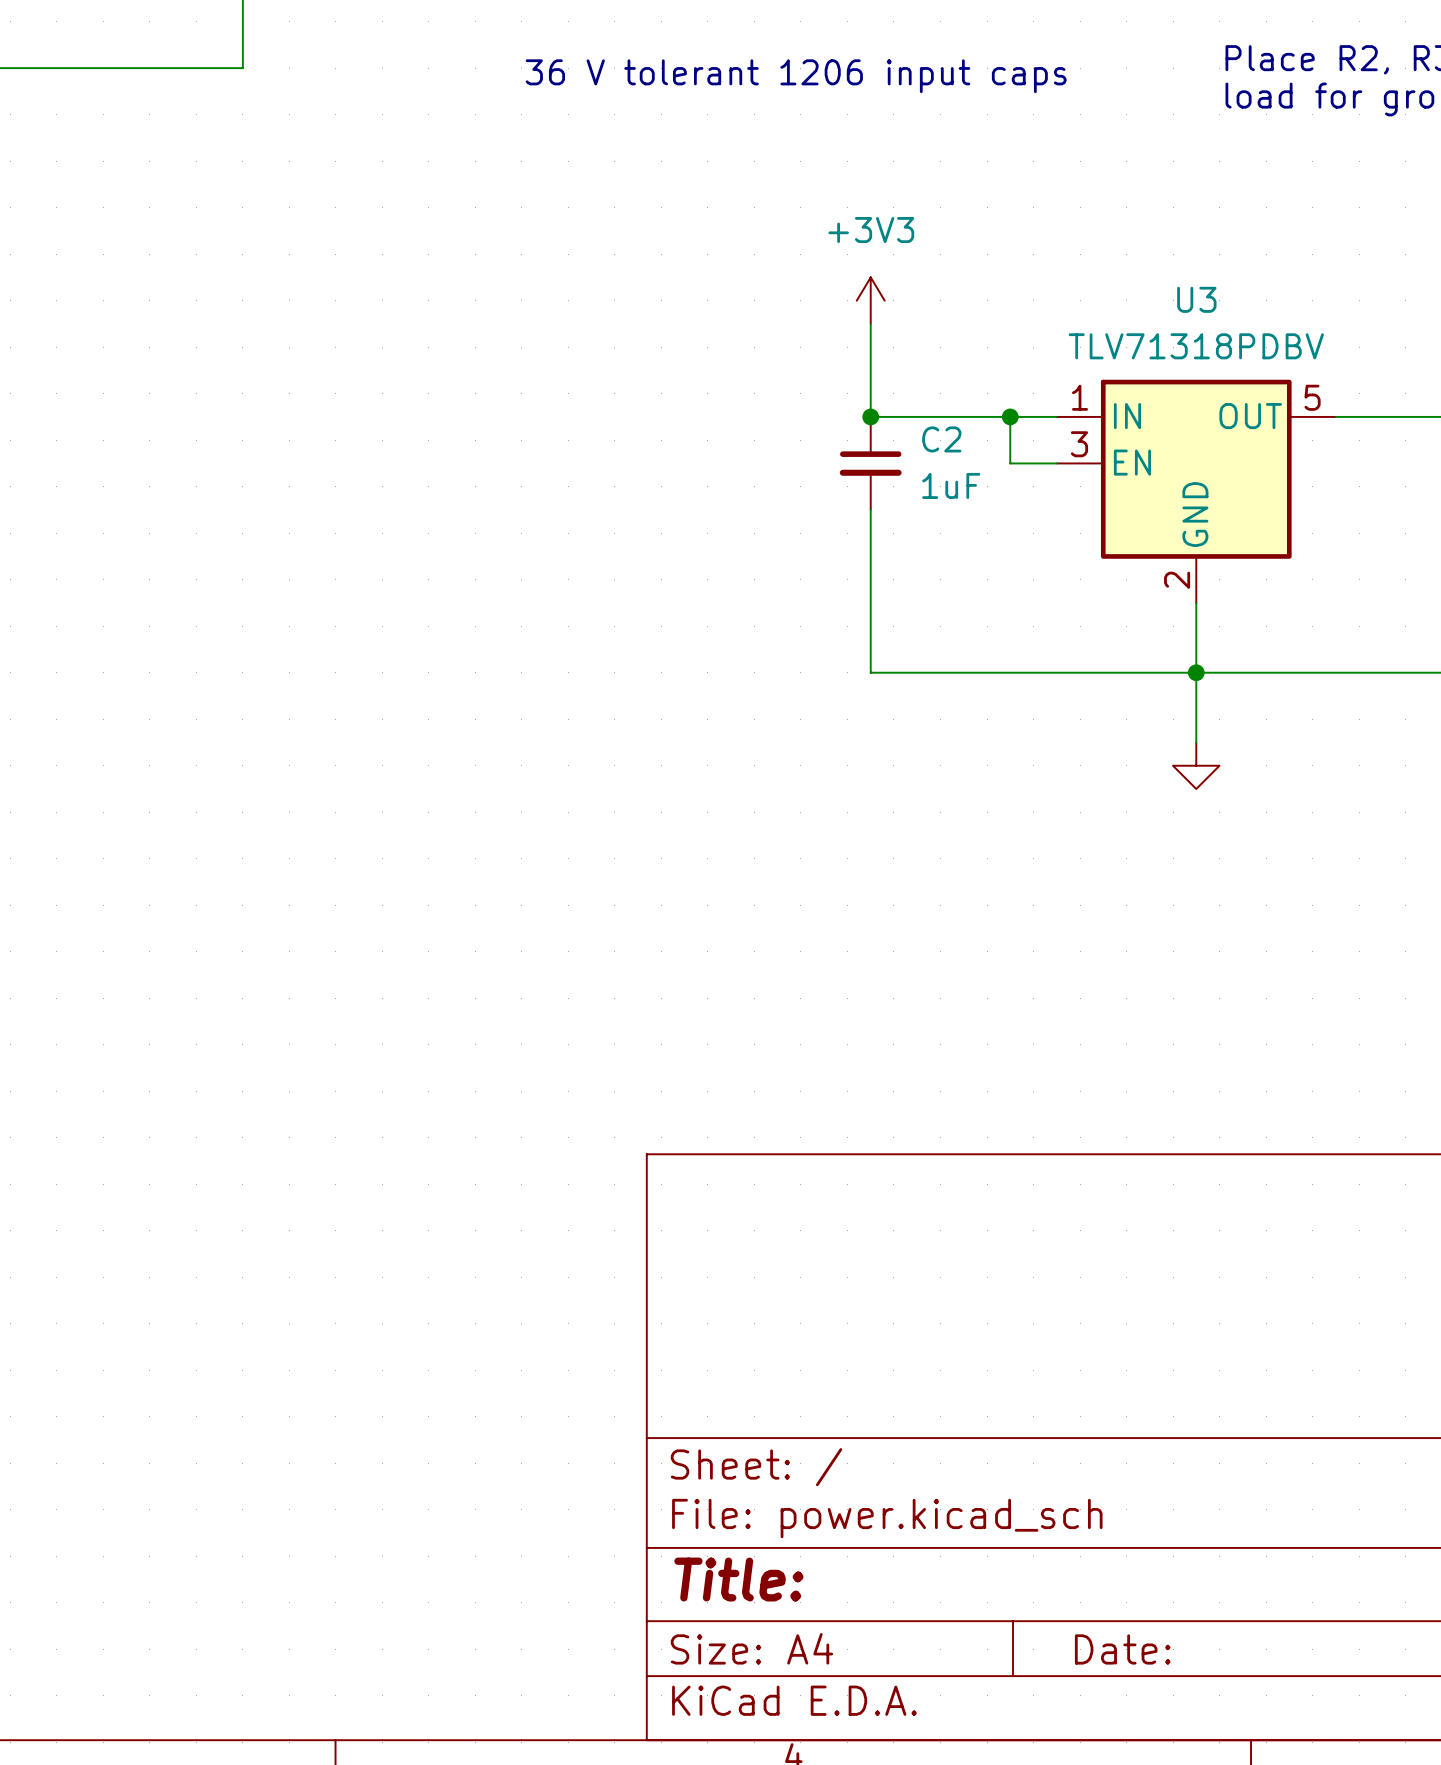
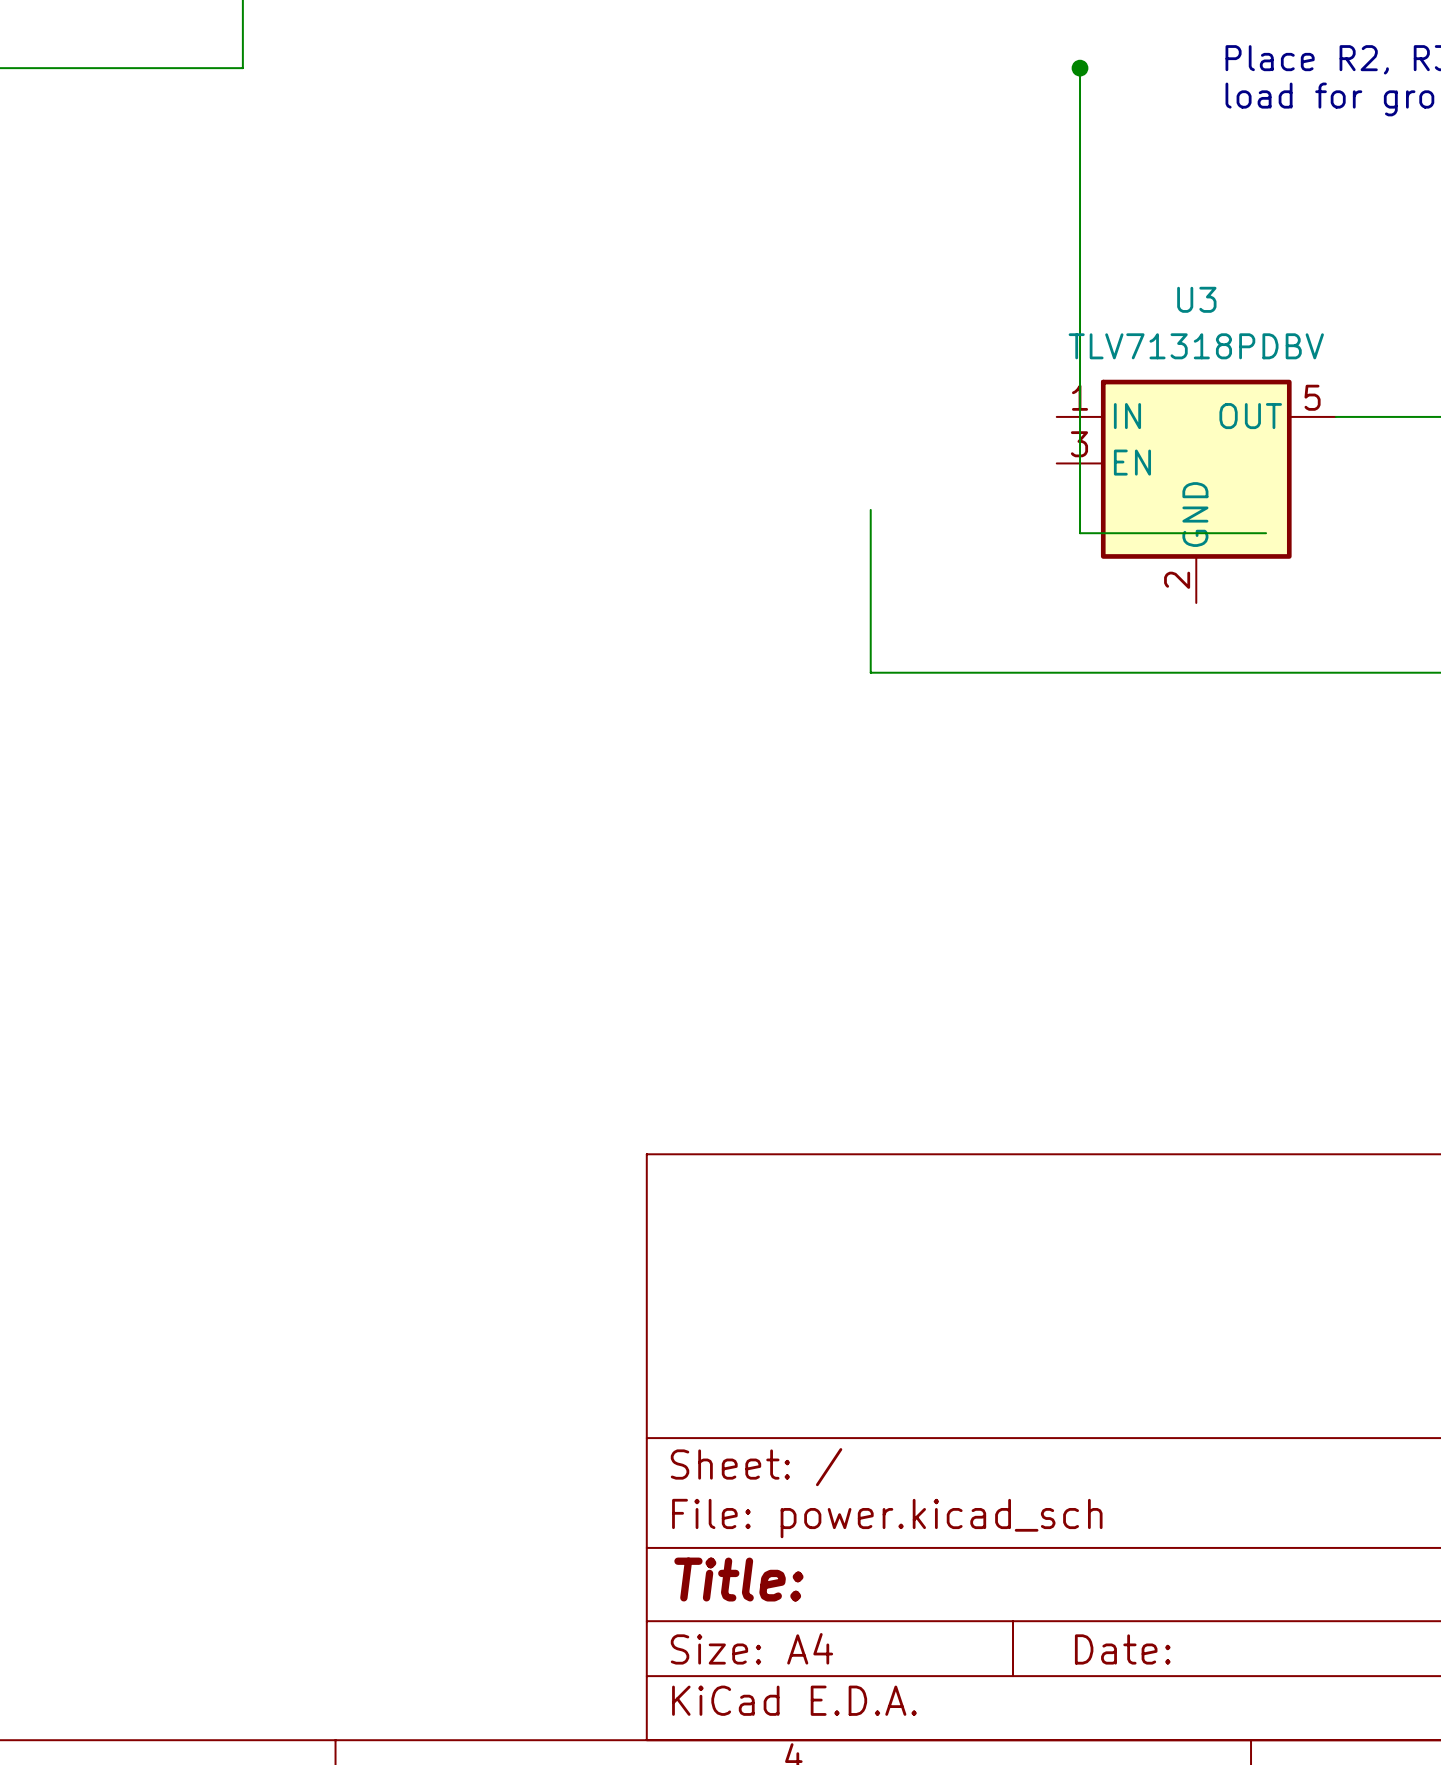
wire: none -> (1080, 68) (1080, 533) (1266, 533)
junction: none -> (1080, 68)
text: 36 V tolerant 1206 input caps (796, 76) -> none
power symbol: +3V3 (870, 300) -> none
wire: (870, 323) (870, 416) (1056, 416) -> none
junction: (870, 416) -> none
wire: (1010, 416) (1010, 463) (1056, 463) -> none
junction: (1010, 416) -> none
C2: 1uF (870, 463) -> none
wire: (1196, 602) (1196, 742) -> none
junction: (1196, 672) -> none
power symbol: (1196, 765) -> none

